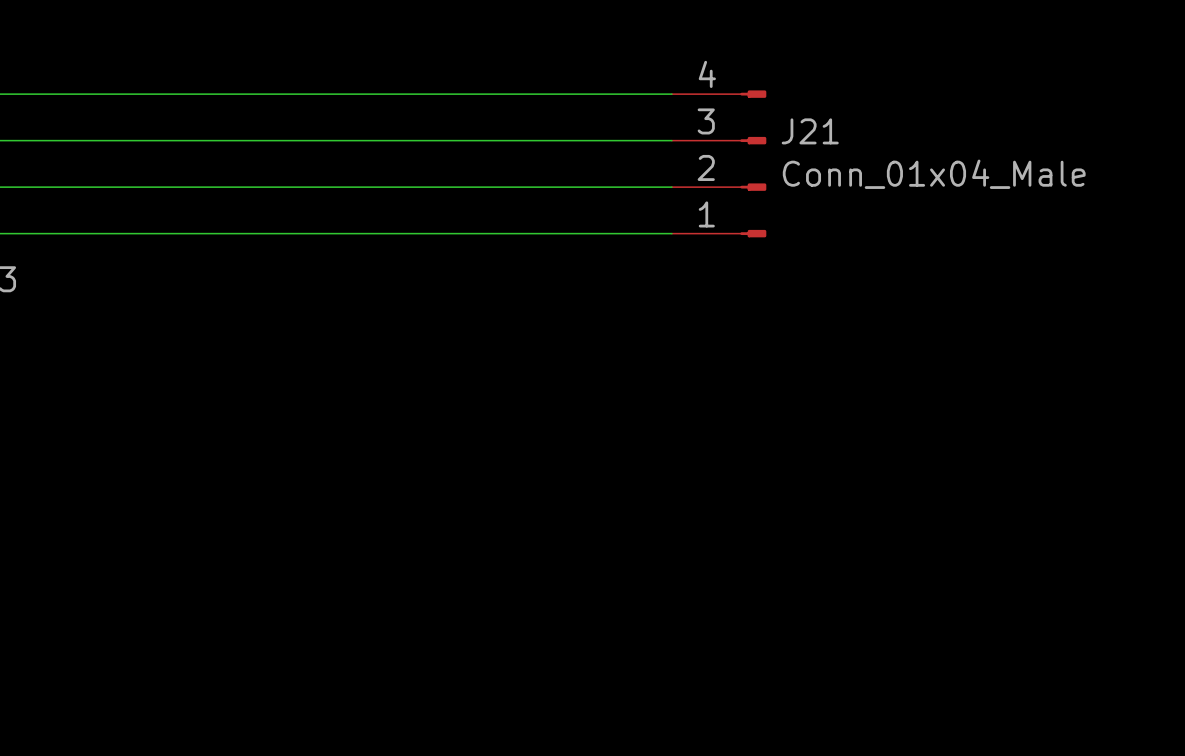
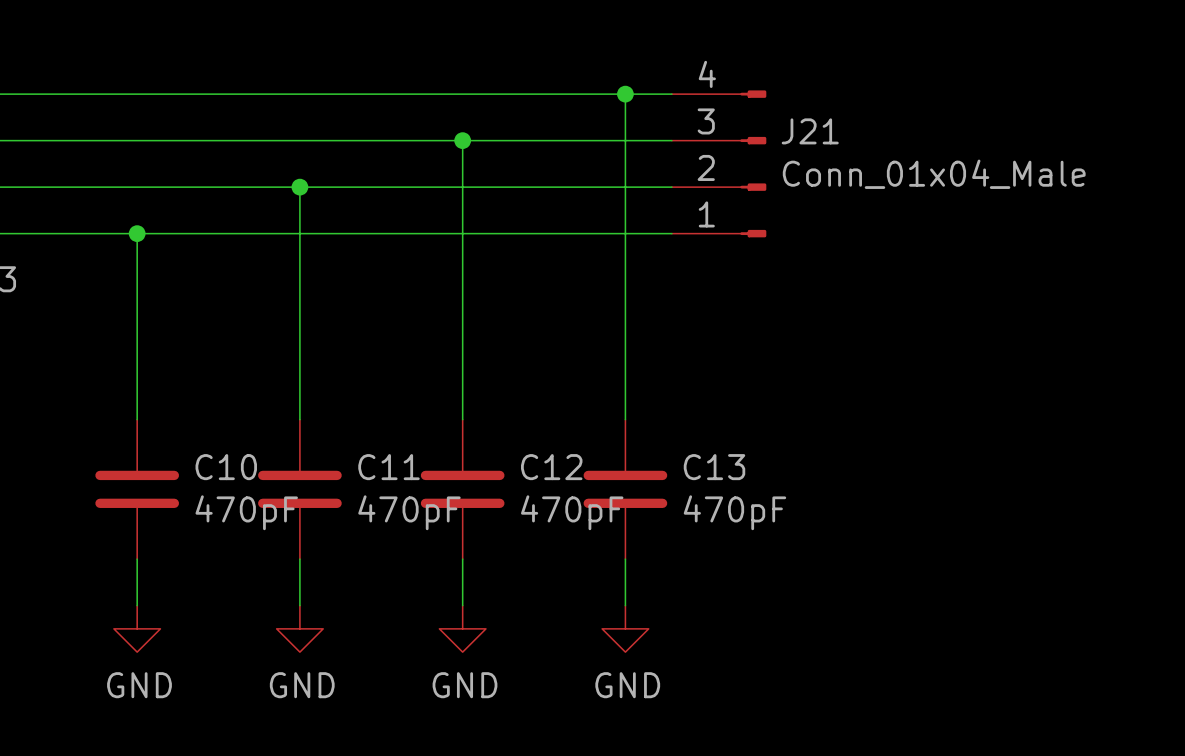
wire: none -> (625, 94) (625, 419)
junction: none -> (625, 94)
wire: none -> (462, 140) (462, 419)
junction: none -> (462, 140)
wire: none -> (299, 187) (299, 419)
junction: none -> (299, 187)
wire: none -> (137, 233) (137, 419)
junction: none -> (137, 233)
C10: none -> 470pF (137, 489)
C11: none -> 470pF (299, 489)
C12: none -> 470pF (462, 489)
C13: none -> 470pF (625, 489)
wire: none -> (137, 559) (137, 605)
wire: none -> (299, 559) (299, 605)
wire: none -> (462, 559) (462, 605)
wire: none -> (625, 559) (625, 605)
power symbol: none -> GND (137, 628)
power symbol: none -> GND (299, 628)
power symbol: none -> GND (462, 628)
power symbol: none -> GND (625, 628)

